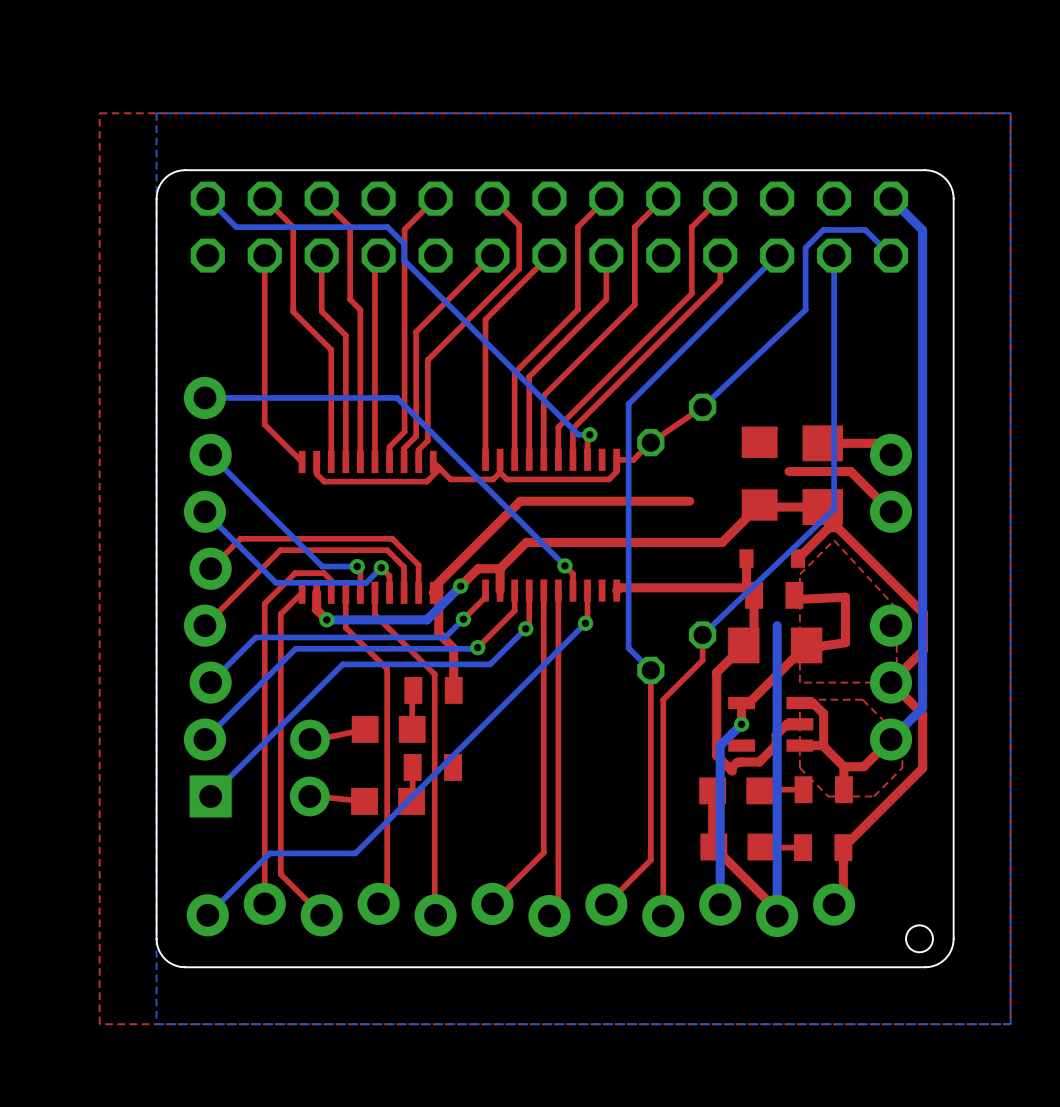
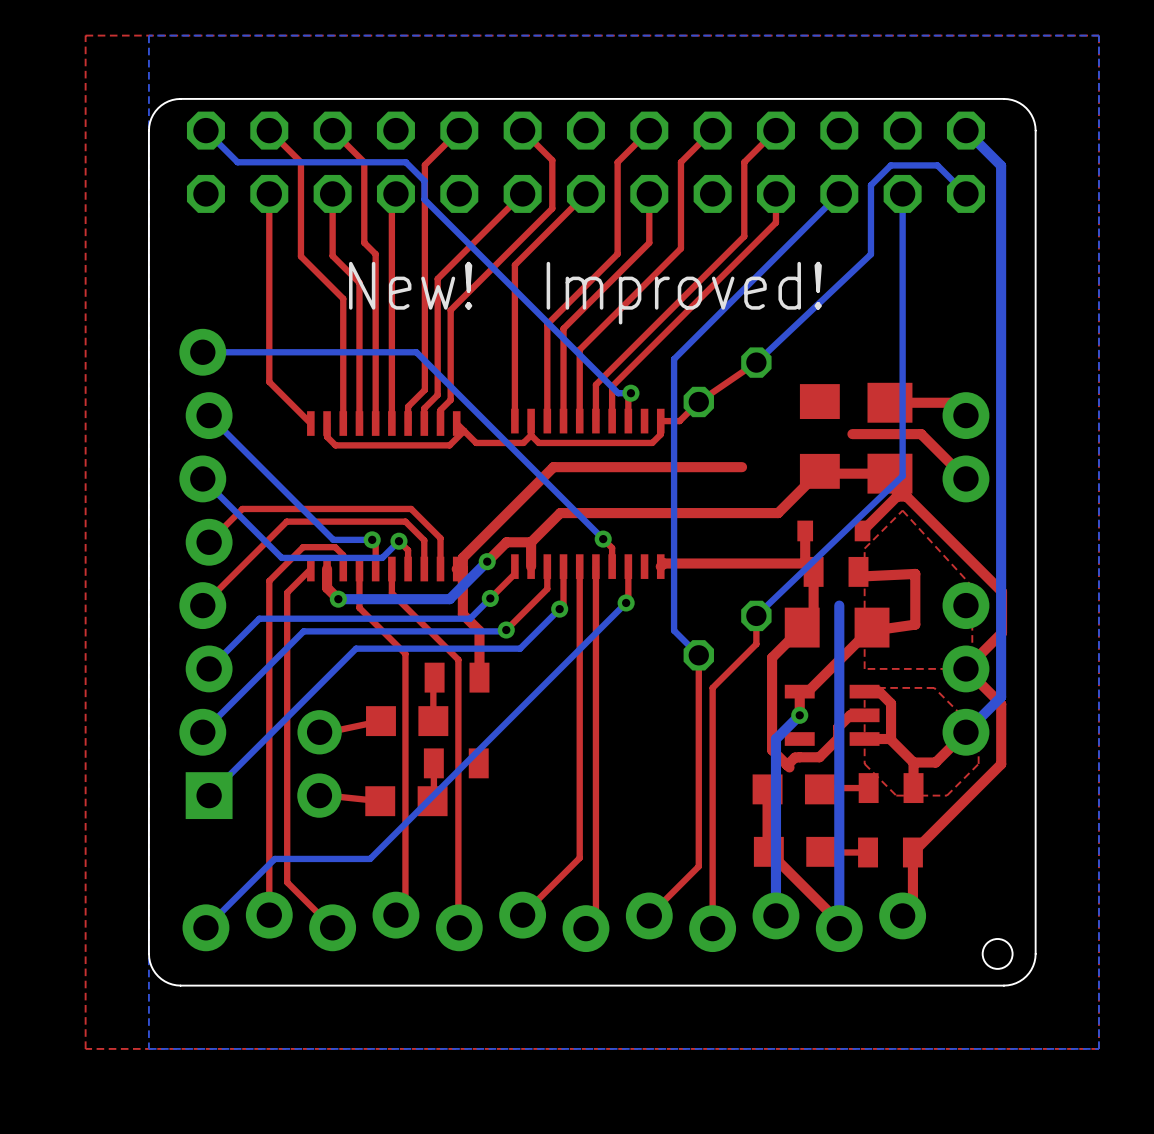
text: none -> New! Improved! (585, 293)

